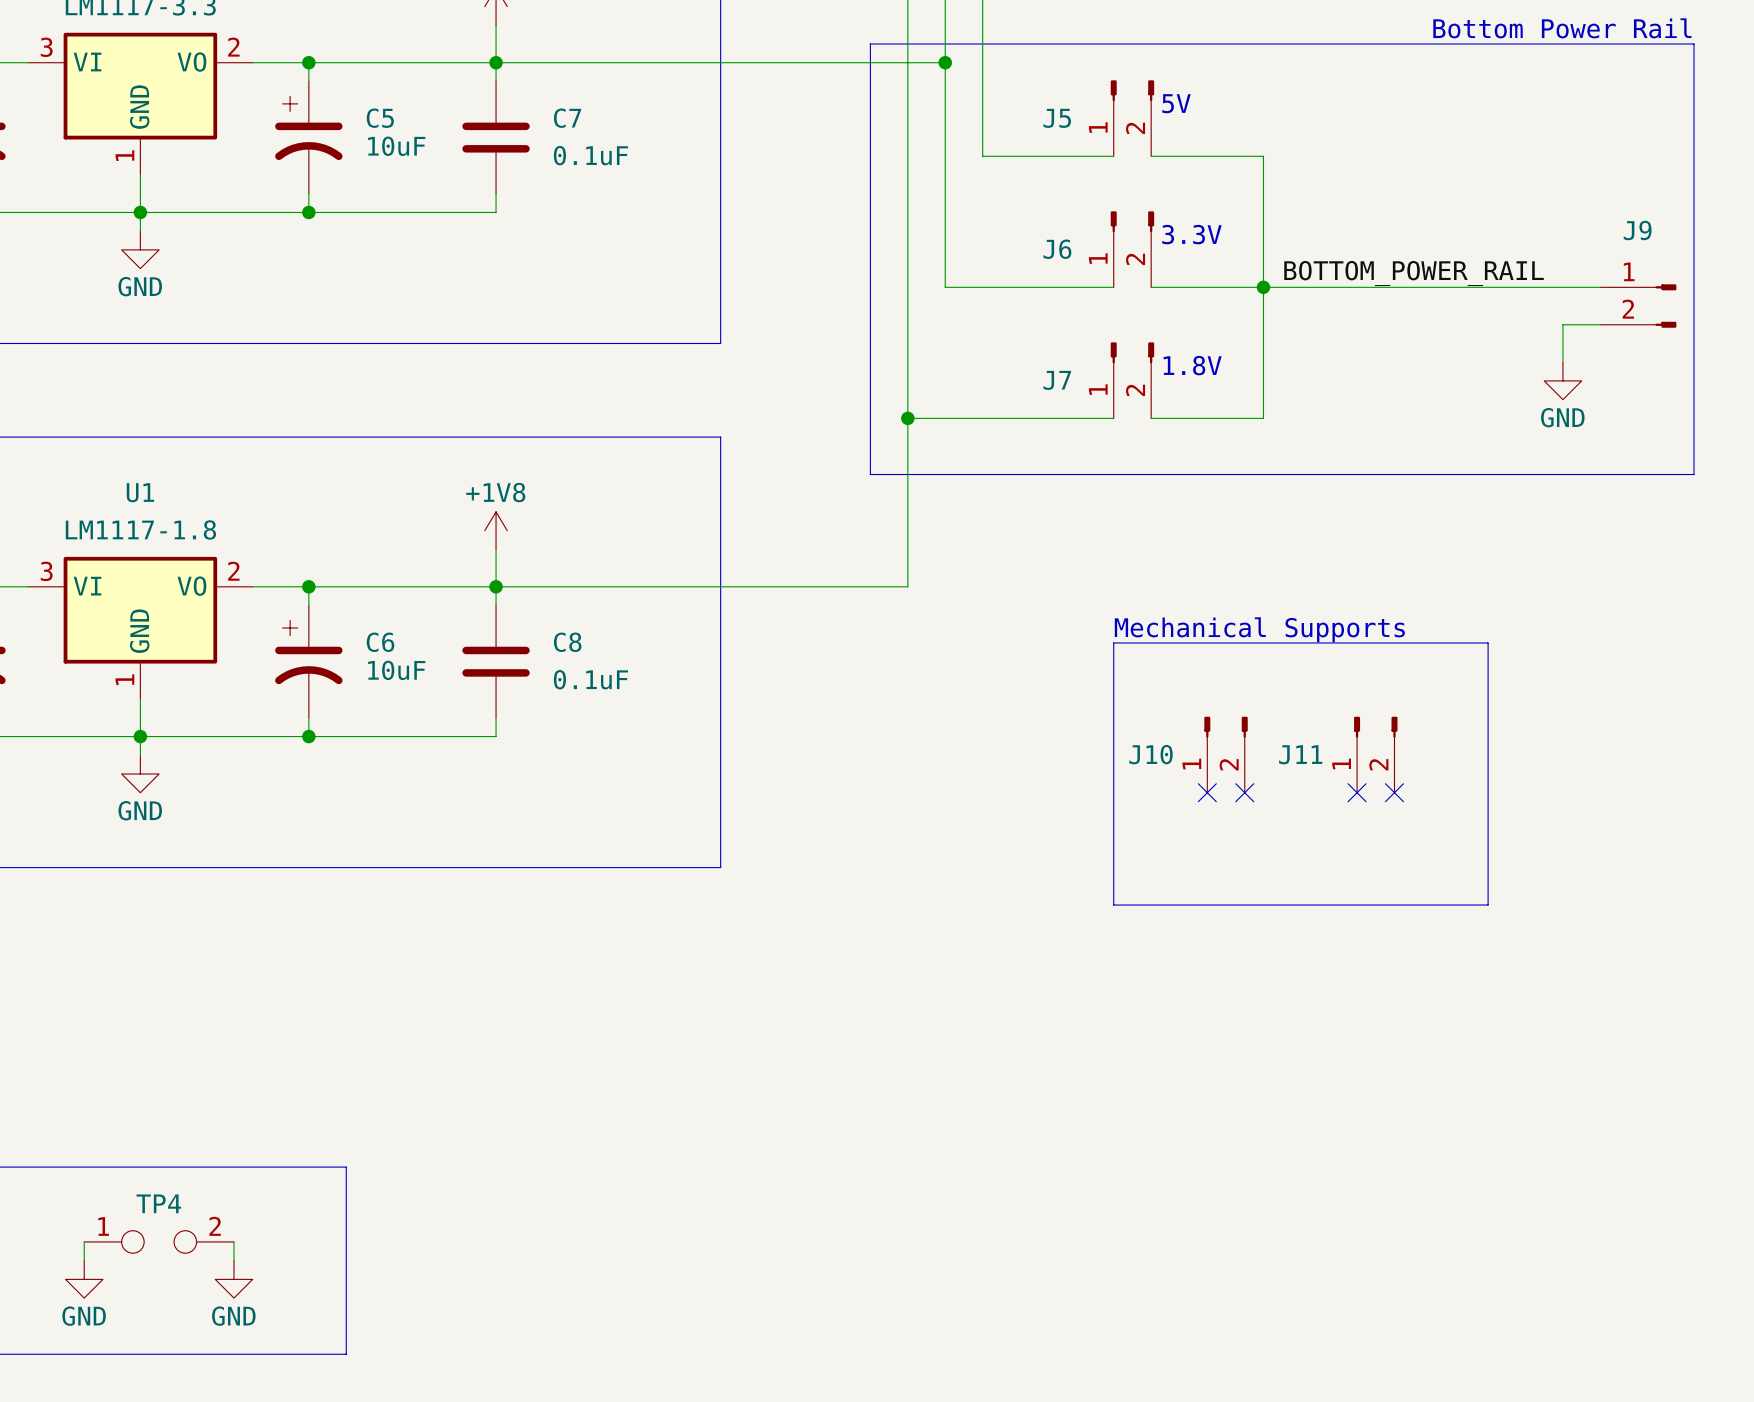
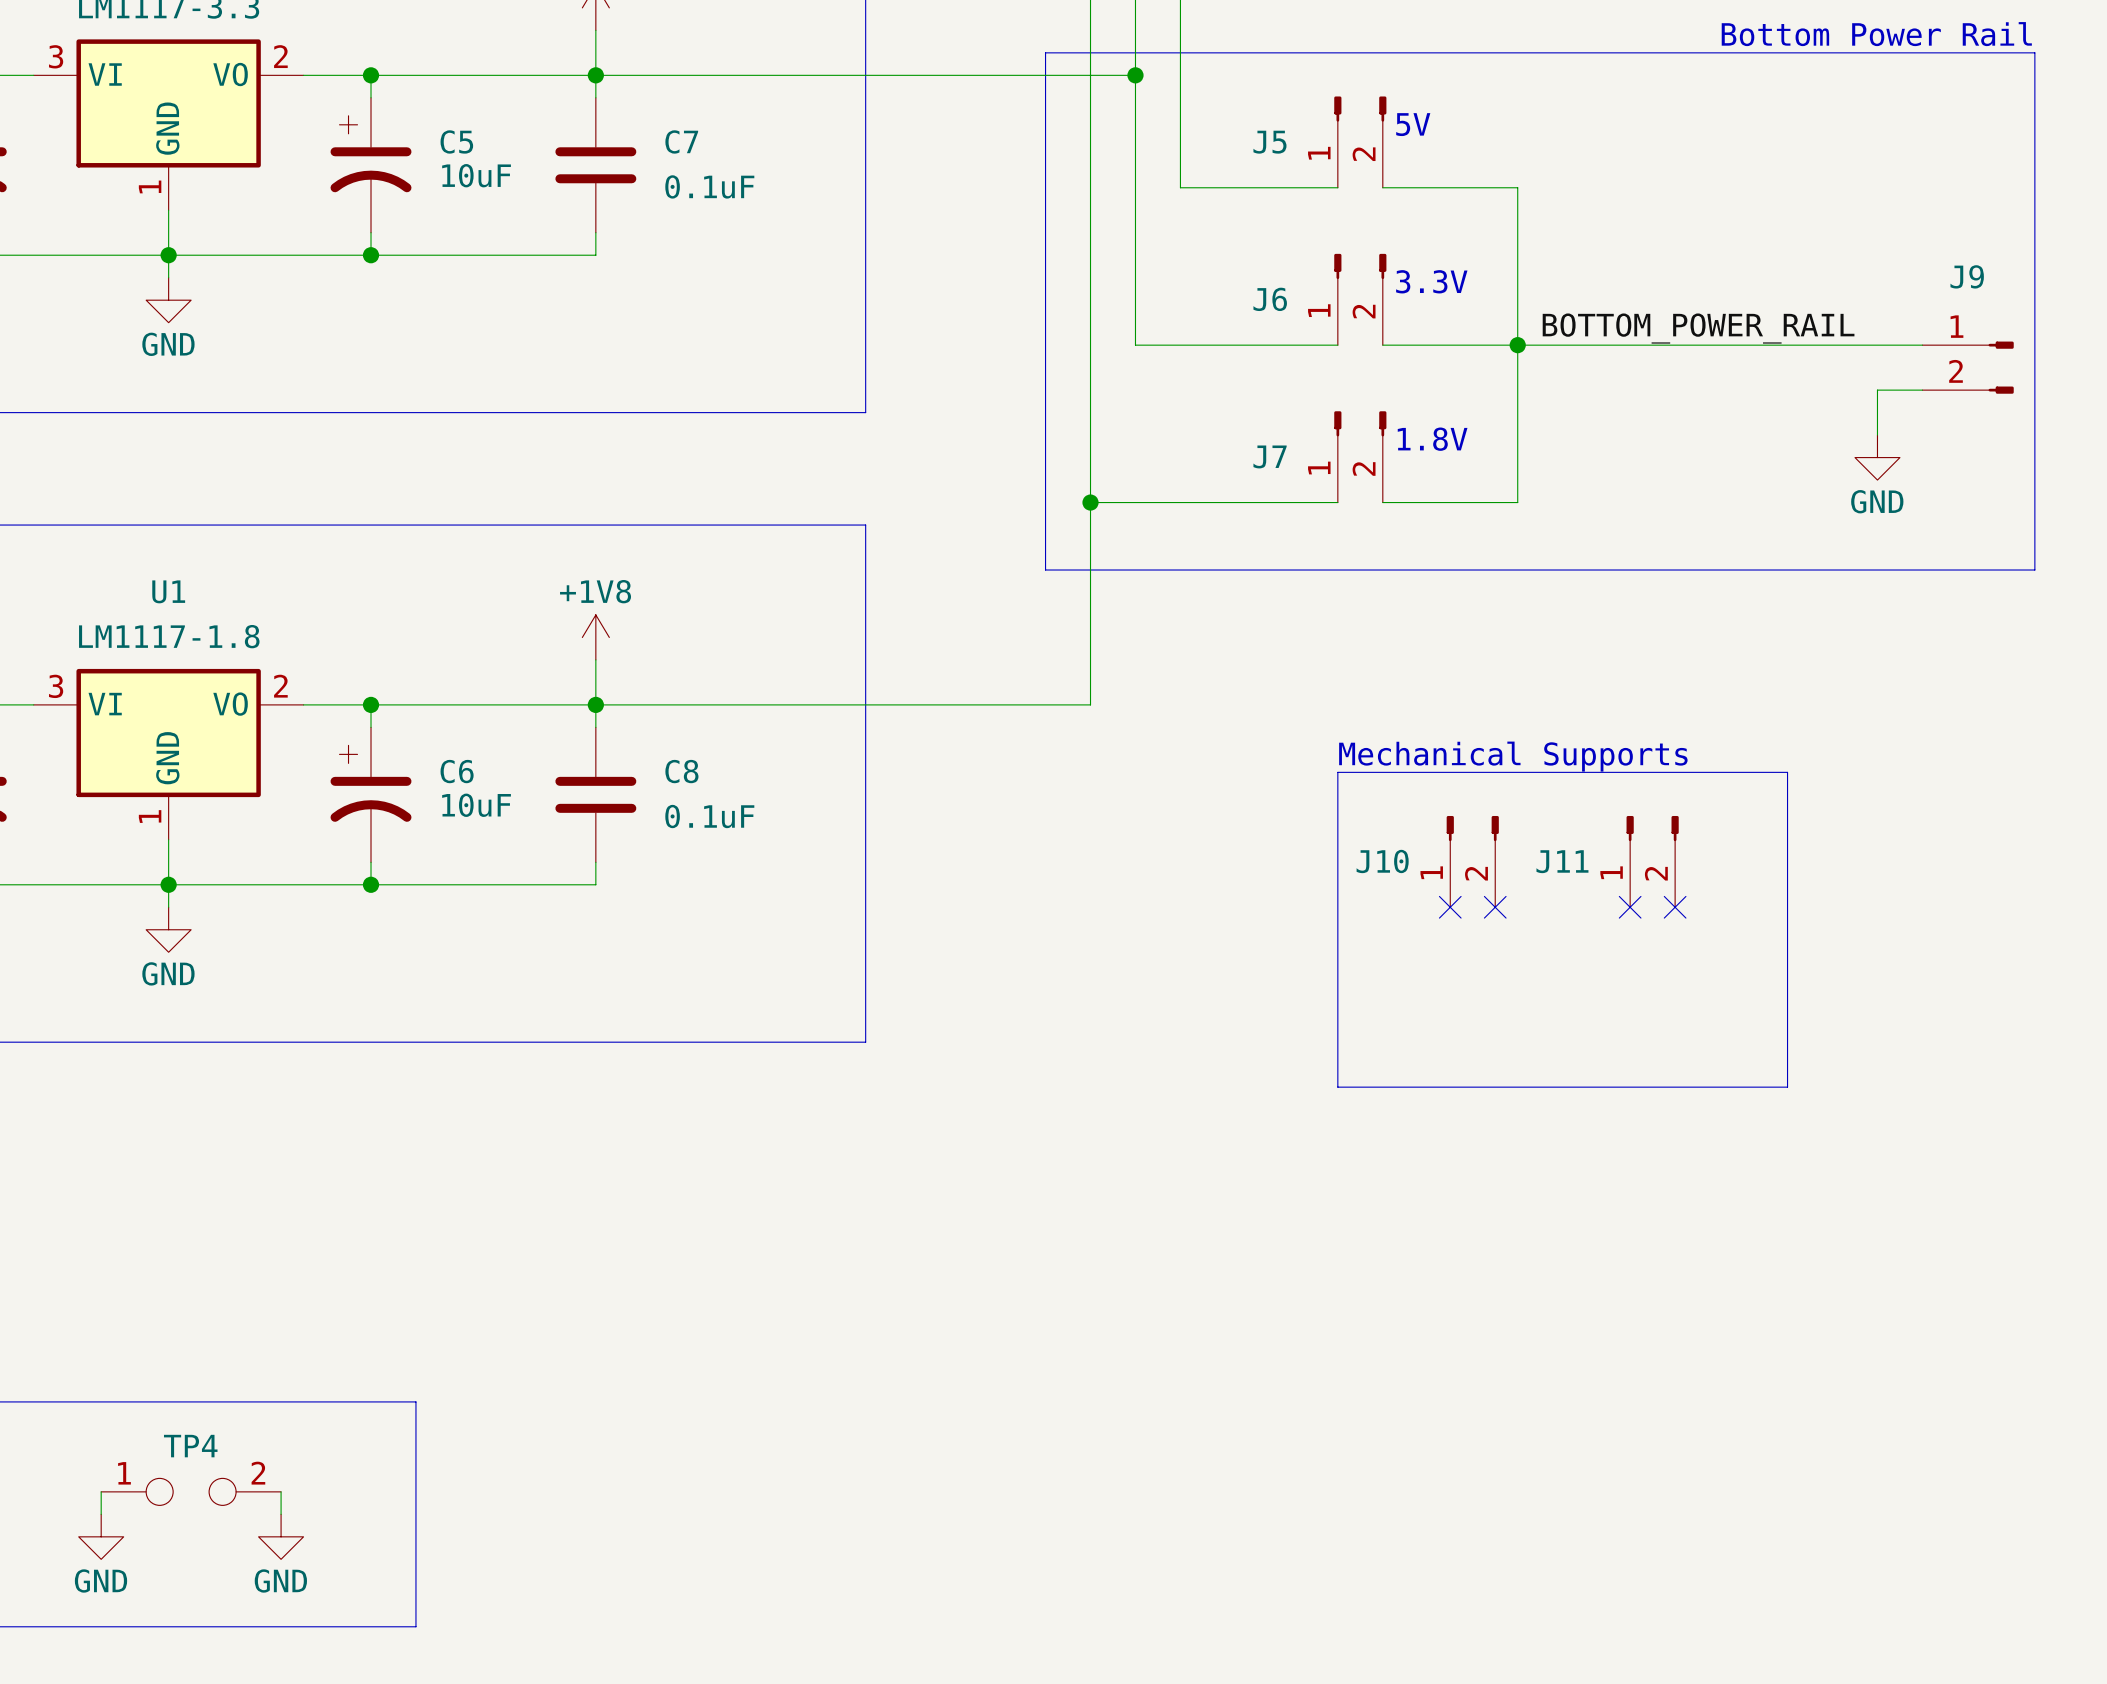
J10 position: (1226, 754) -> (1472, 861)
J11 position: (1375, 754) -> (1652, 861)
no-connect mark: none -> (1450, 907)
no-connect mark: none -> (1495, 907)
no-connect mark: none -> (1630, 907)
no-connect mark: none -> (1675, 907)
no-connect mark: (1207, 792) -> none
no-connect mark: (1244, 792) -> none
no-connect mark: (1357, 792) -> none
no-connect mark: (1394, 792) -> none

